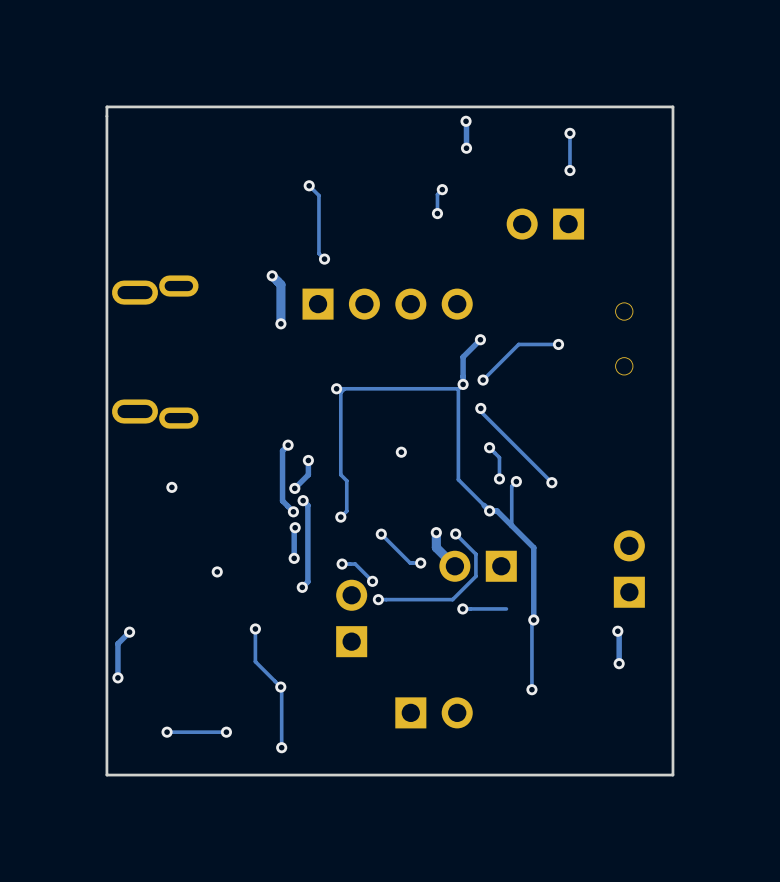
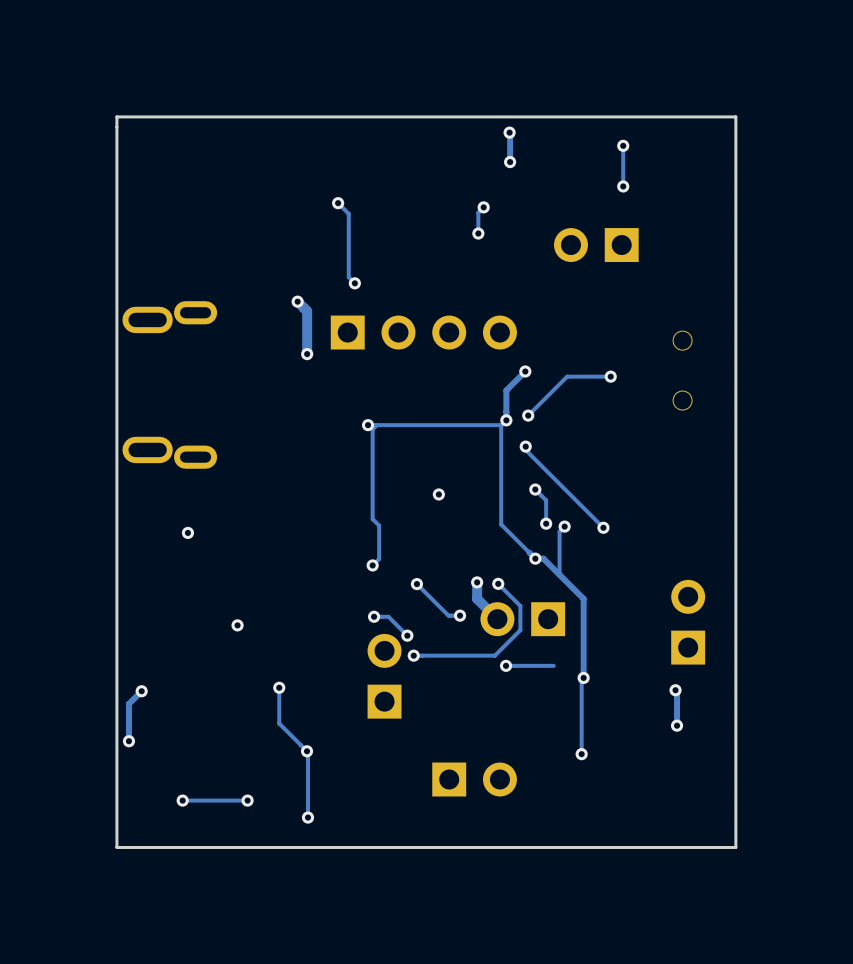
track: (288, 445) (282, 450) (282, 500) (293, 511) -> none
via: (288, 445) -> none
track: (308, 460) (308, 474) (294, 488) -> none
via: (308, 460) -> none
via: (294, 488) -> none
track: (303, 500) (307, 505) (307, 581) (302, 587) -> none
via: (303, 500) -> none
via: (293, 511) -> none
track: (295, 527) (294, 558) -> none
via: (295, 527) -> none
via: (294, 558) -> none
via: (302, 587) -> none

